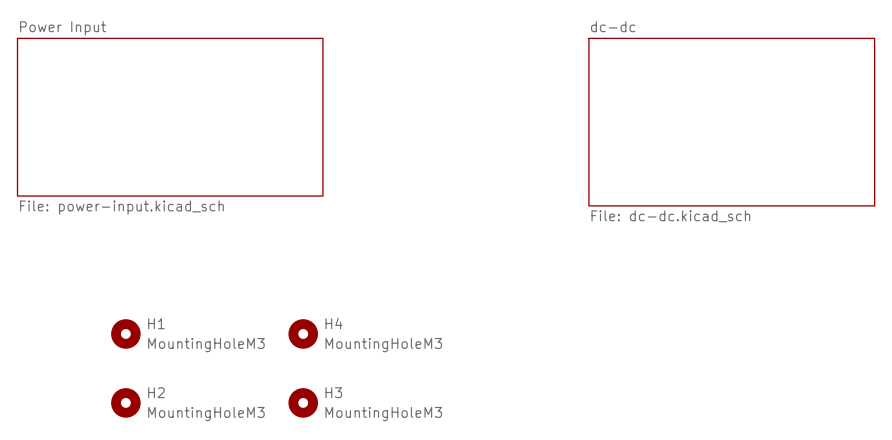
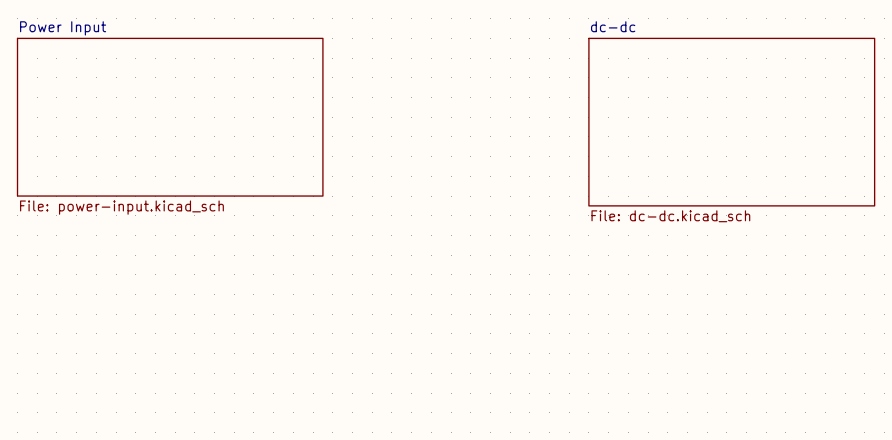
H1: MountingHoleM3 (125, 333) -> none
H4: MountingHoleM3 (303, 333) -> none
H2: MountingHoleM3 (125, 402) -> none
H3: MountingHoleM3 (303, 402) -> none

